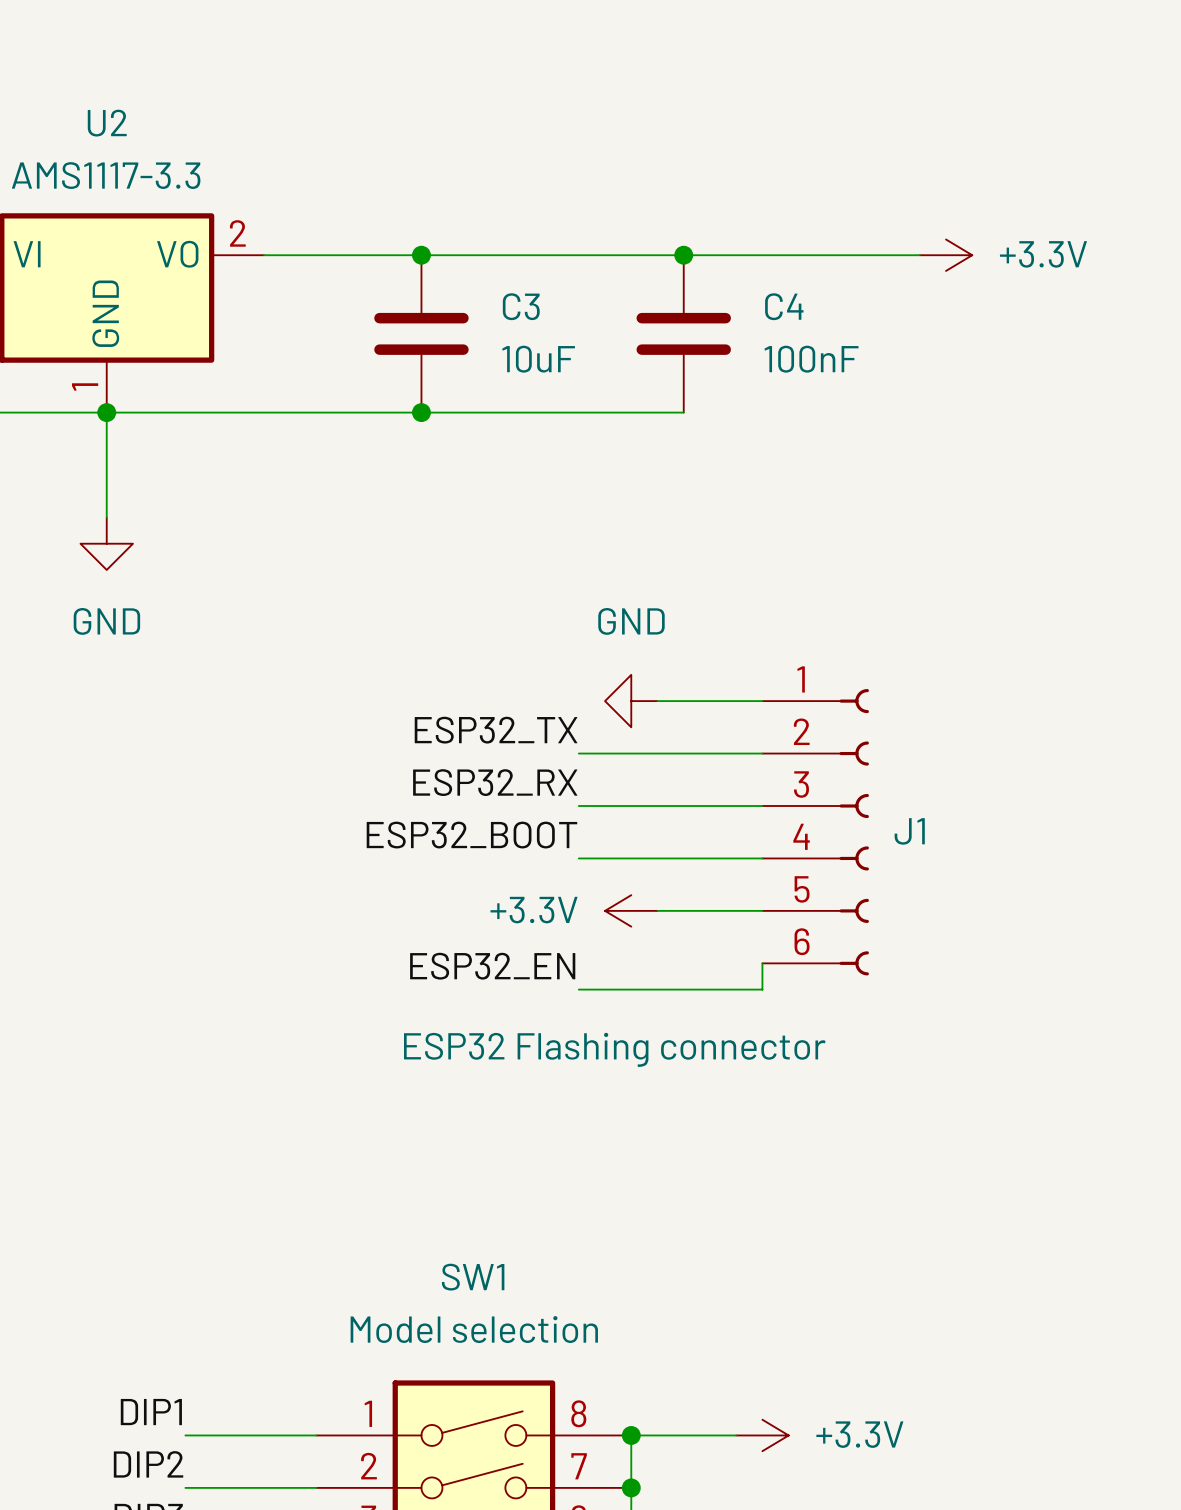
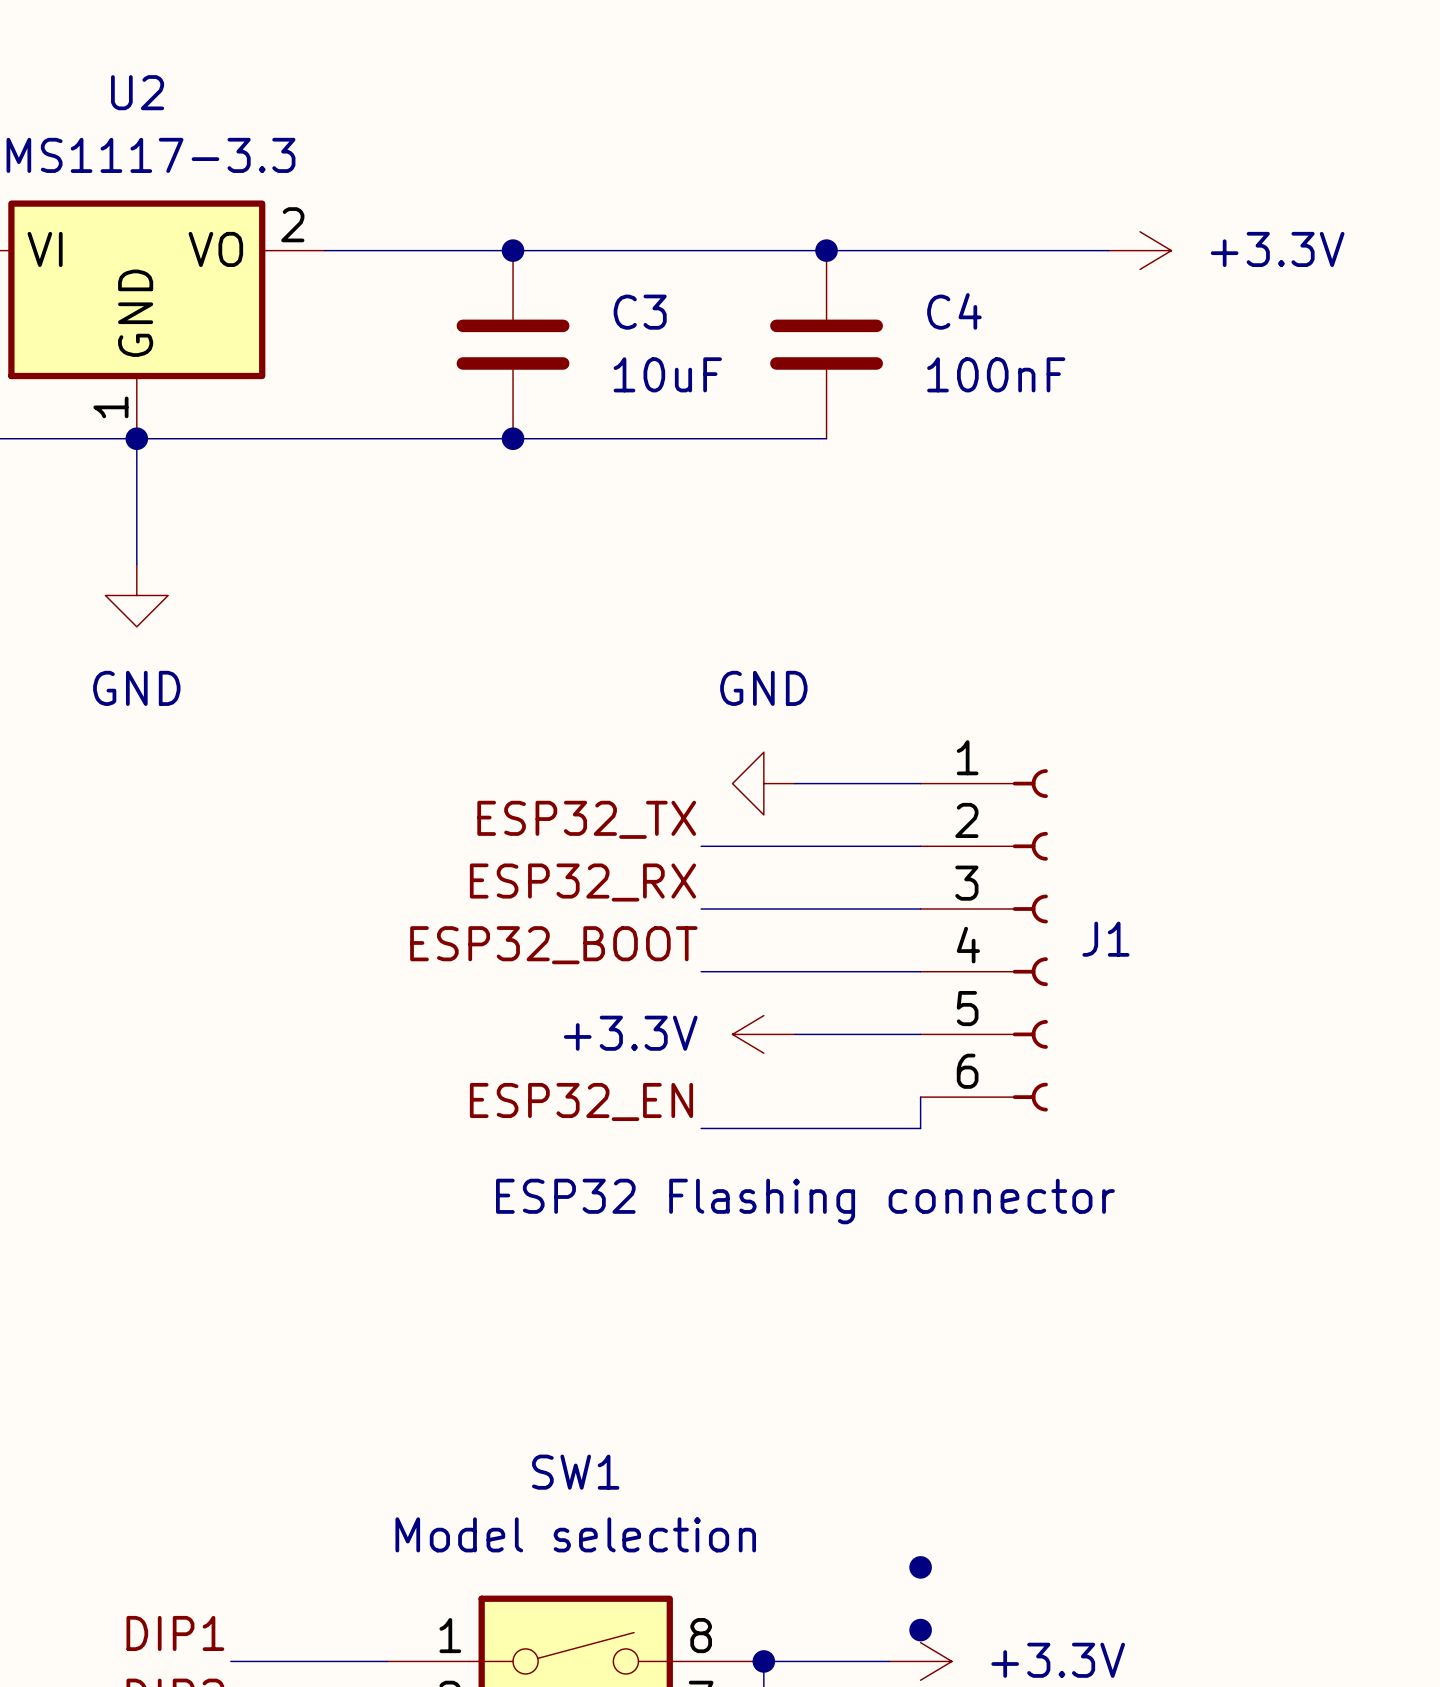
junction: none -> (920, 1567)
junction: none -> (920, 1630)

